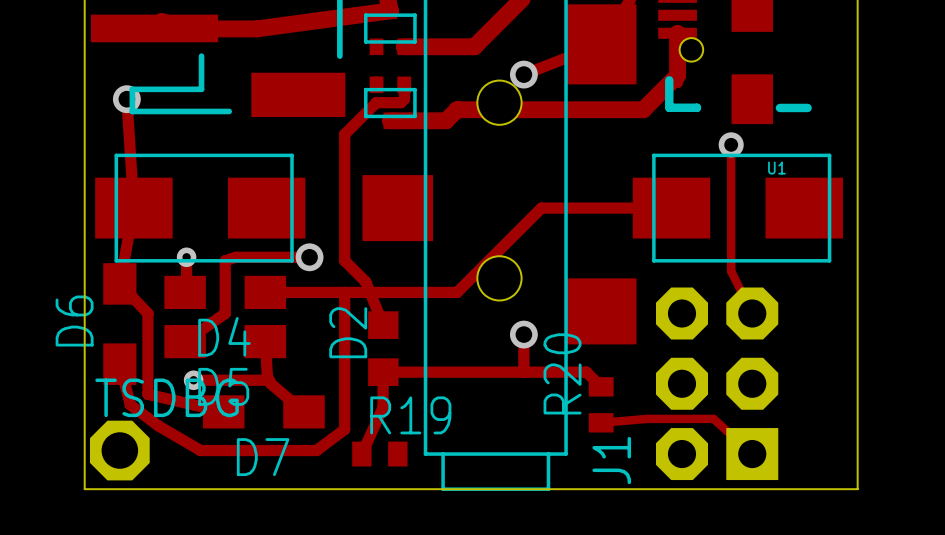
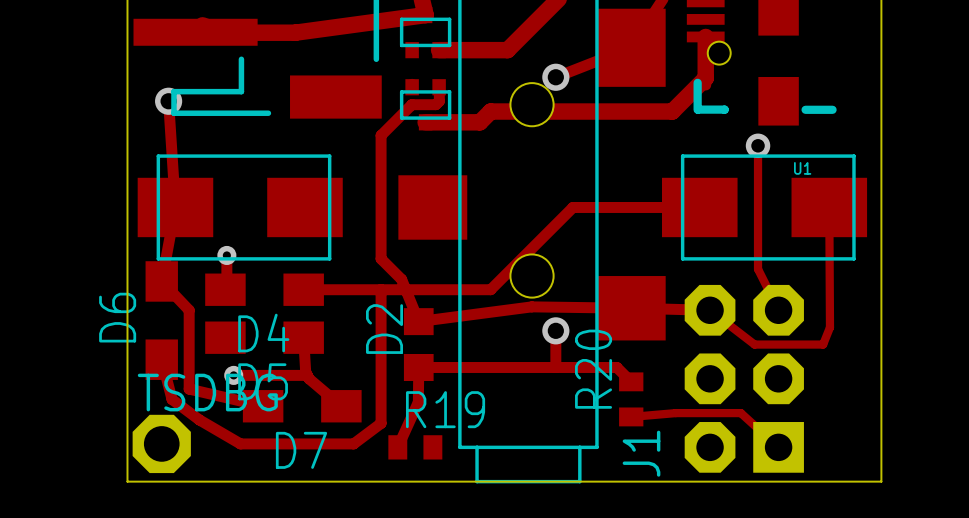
track: none -> (829, 207) (829, 327) (823, 344) (754, 344) (710, 310) (531, 306) (418, 321)
track: (309, 257) (235, 257) (225, 260) (225, 313) (185, 341) -> none
via: (309, 257) -> none

